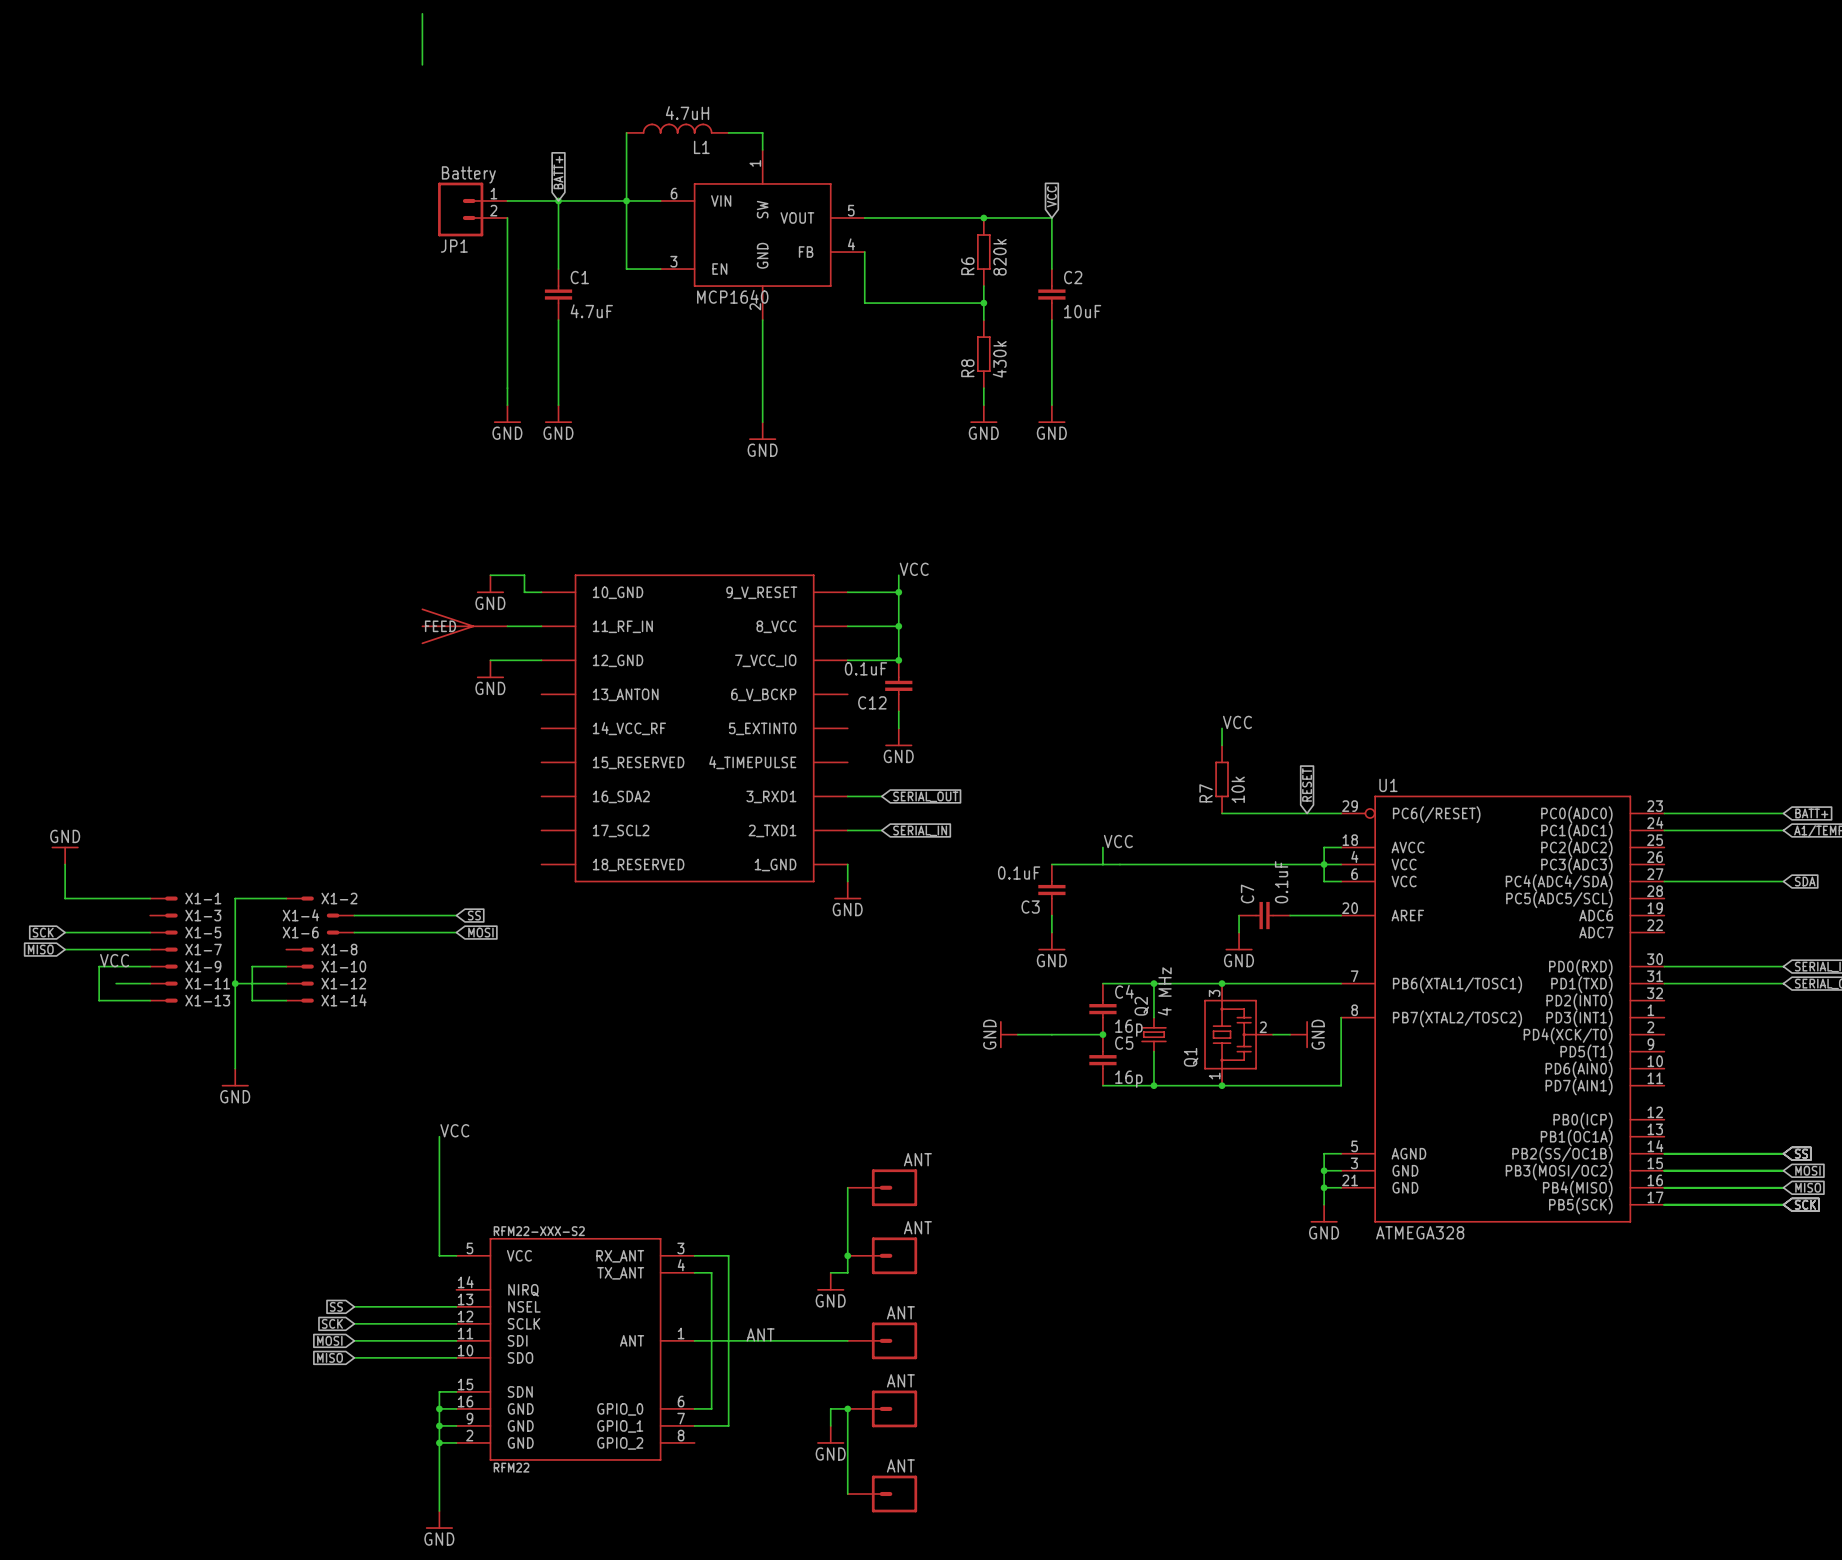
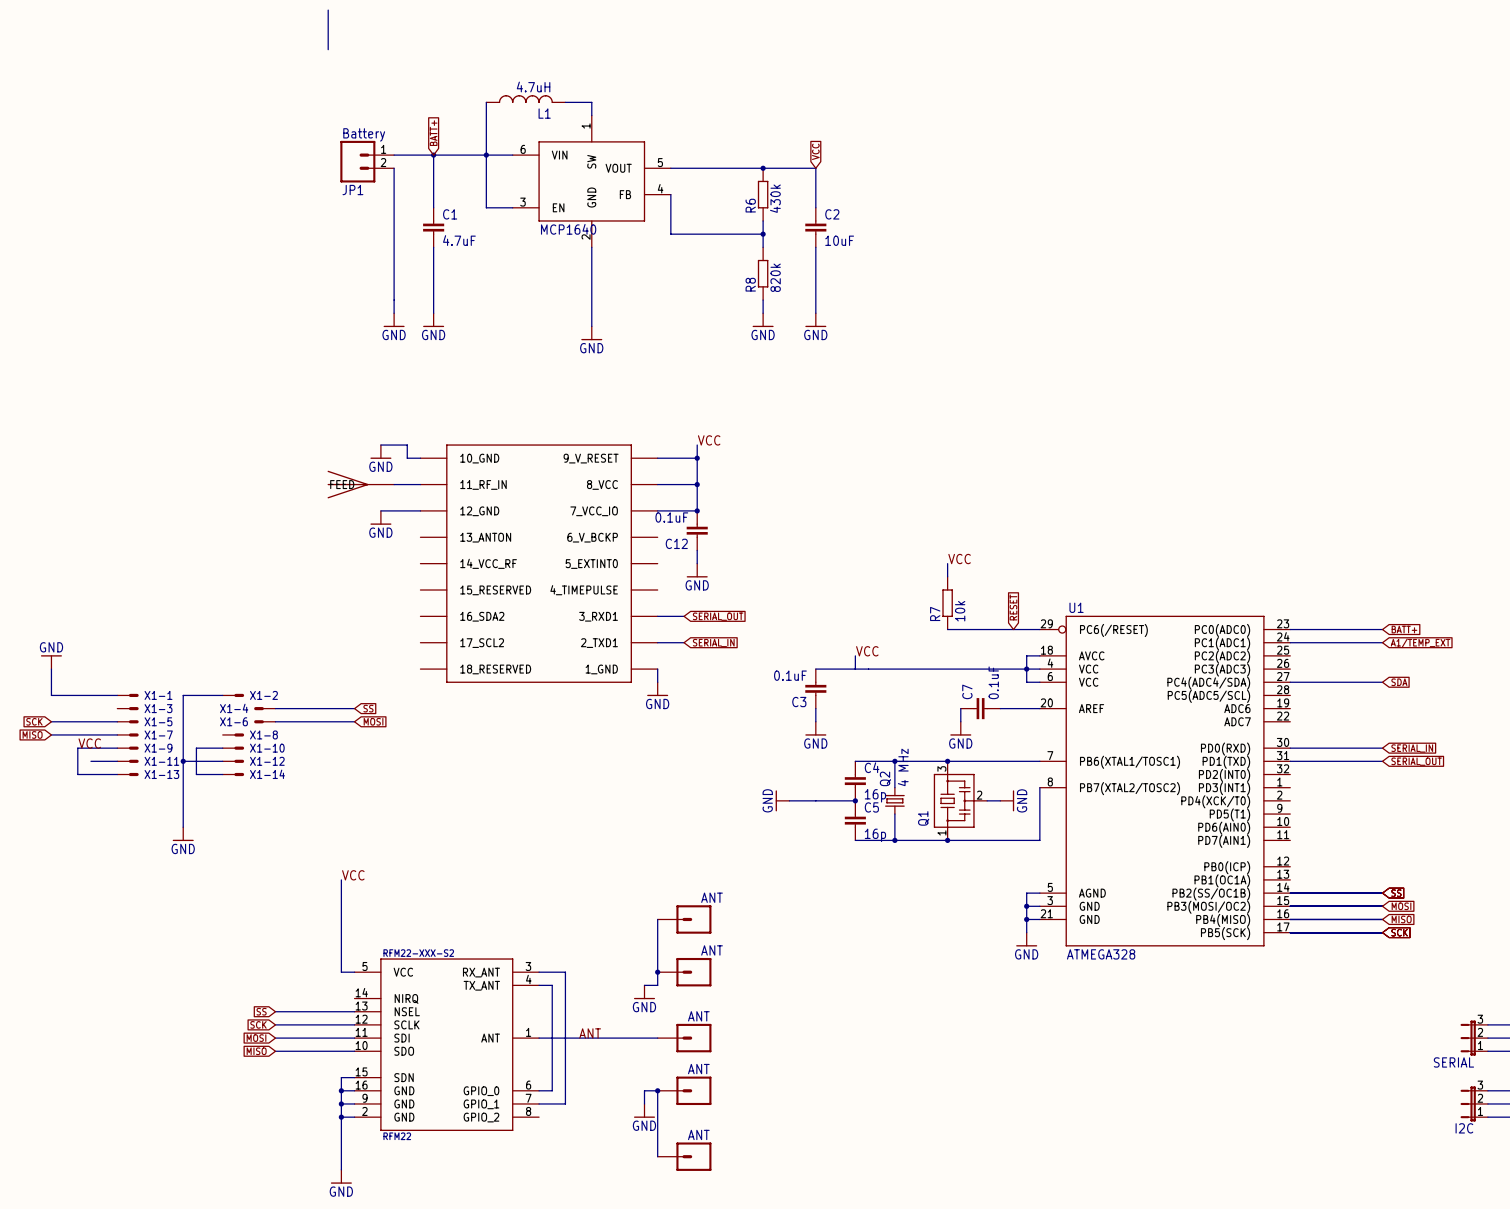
R6 value: 820k (1000, 257) -> 430k (775, 198)
R8 value: 430k (999, 359) -> 820k (775, 277)

